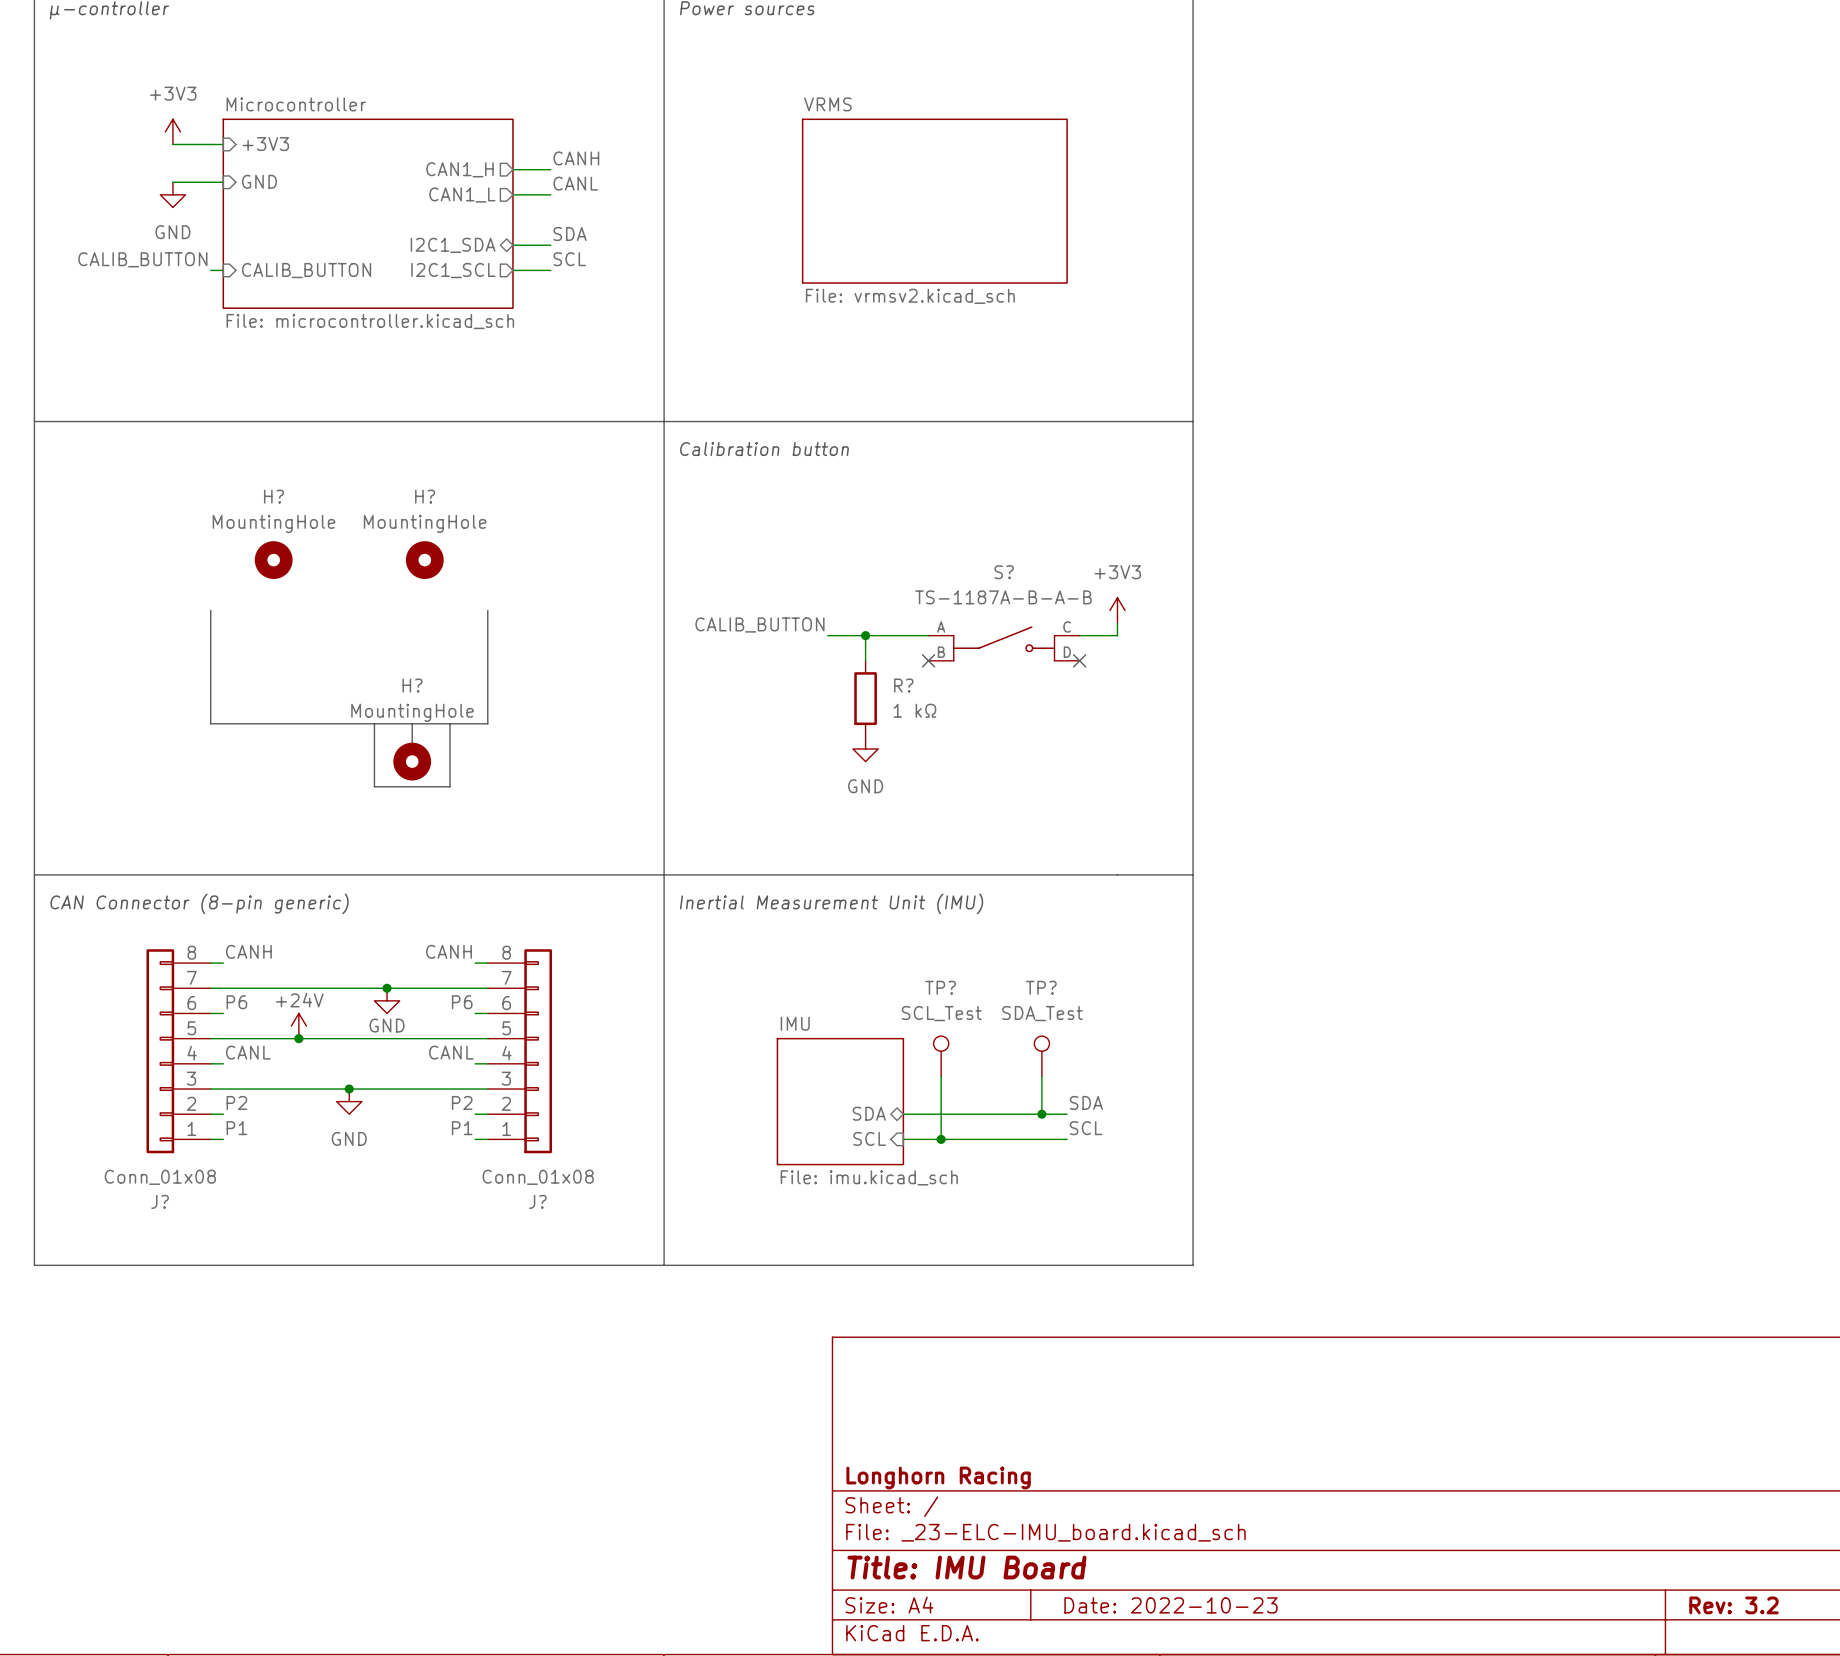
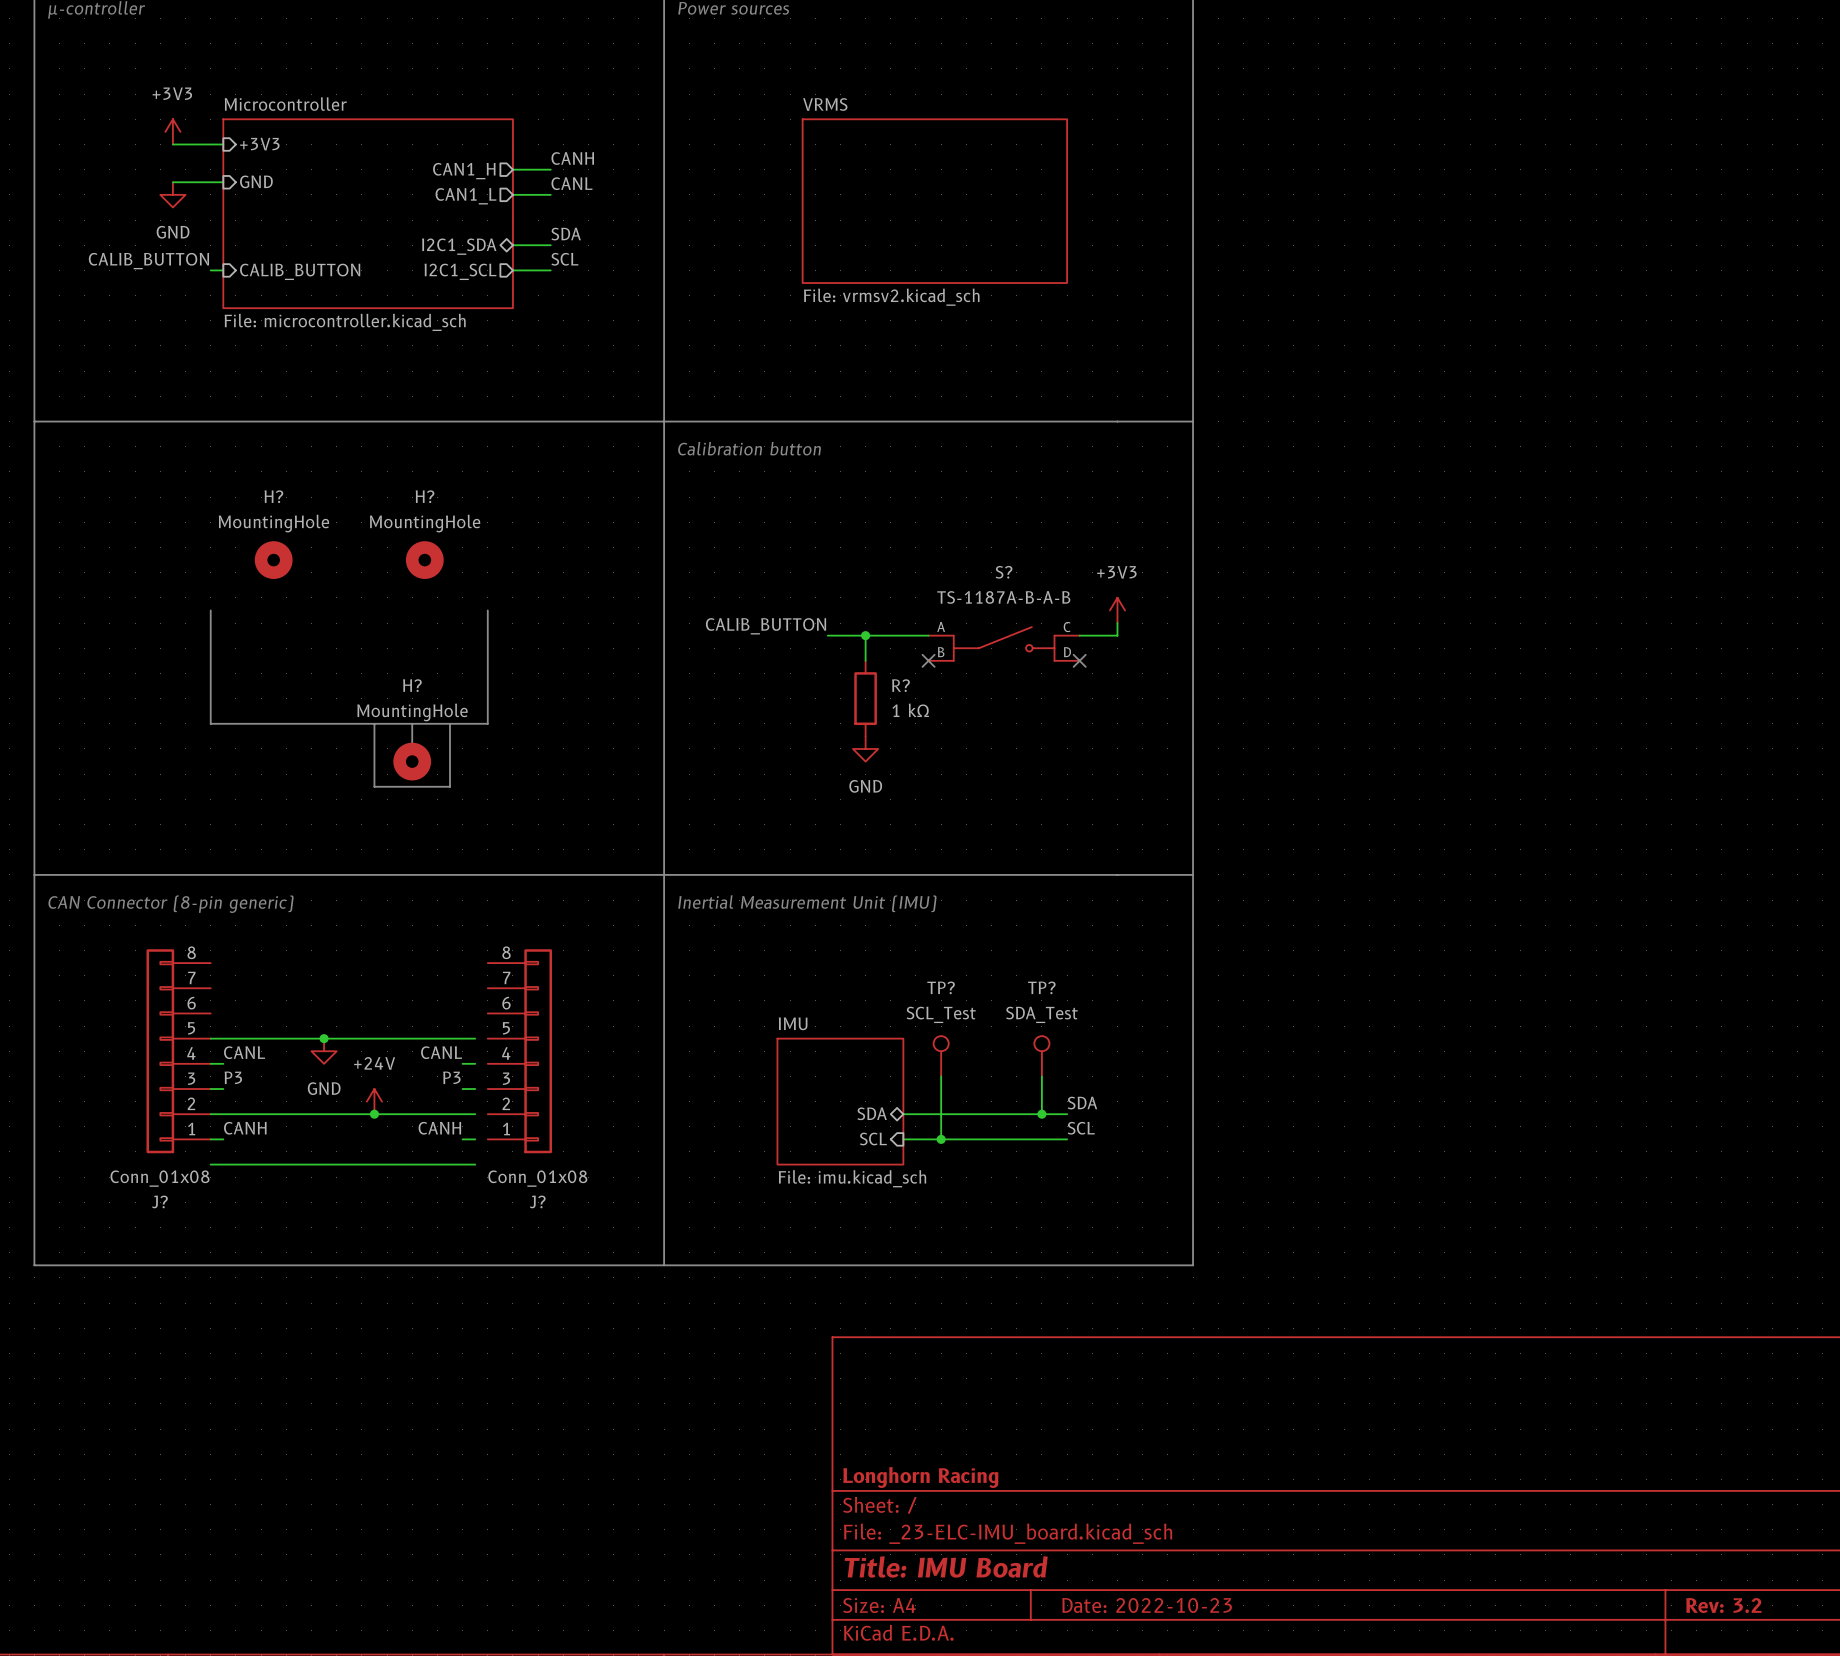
label: CANH (248, 951) -> none
label: CANH (449, 951) -> none
wire: (210, 963) (223, 963) -> none
wire: (475, 963) (487, 963) -> none
wire: (210, 988) (487, 988) -> none
junction: (387, 988) -> none
power symbol text position: +24V (299, 1000) -> +24V (374, 1063)
power symbol: GND (387, 1000) -> none
label: P6 (236, 1002) -> none
label: P6 (462, 1002) -> none
wire: (210, 1013) (223, 1013) -> none
wire: (475, 1013) (487, 1013) -> none
power symbol position: +24V (298, 1026) -> +24V (374, 1101)
junction position: (298, 1038) -> (324, 1038)
wire: (475, 1038) (487, 1038) -> none
power symbol: none -> GND (324, 1051)
label position: CANL (451, 1052) -> CANL (441, 1052)
wire: (475, 1063) (487, 1063) -> (475, 1063) (462, 1063)
label: none -> P3 (233, 1077)
label: none -> P3 (451, 1077)
wire: (223, 1089) (462, 1089) -> none
junction: (349, 1089) -> none
wire: (475, 1089) (487, 1089) -> none
power symbol: GND (349, 1101) -> none
label: P2 (236, 1102) -> none
label: P2 (462, 1102) -> none
junction: none -> (374, 1114)
wire: (475, 1114) (487, 1114) -> (475, 1114) (223, 1114)
label: P1 (236, 1128) -> CANH (245, 1128)
label: none -> CANH (439, 1128)
label: P1 (462, 1128) -> none
wire: (475, 1139) (487, 1139) -> (475, 1139) (462, 1139)
wire: none -> (210, 1164) (475, 1164)

